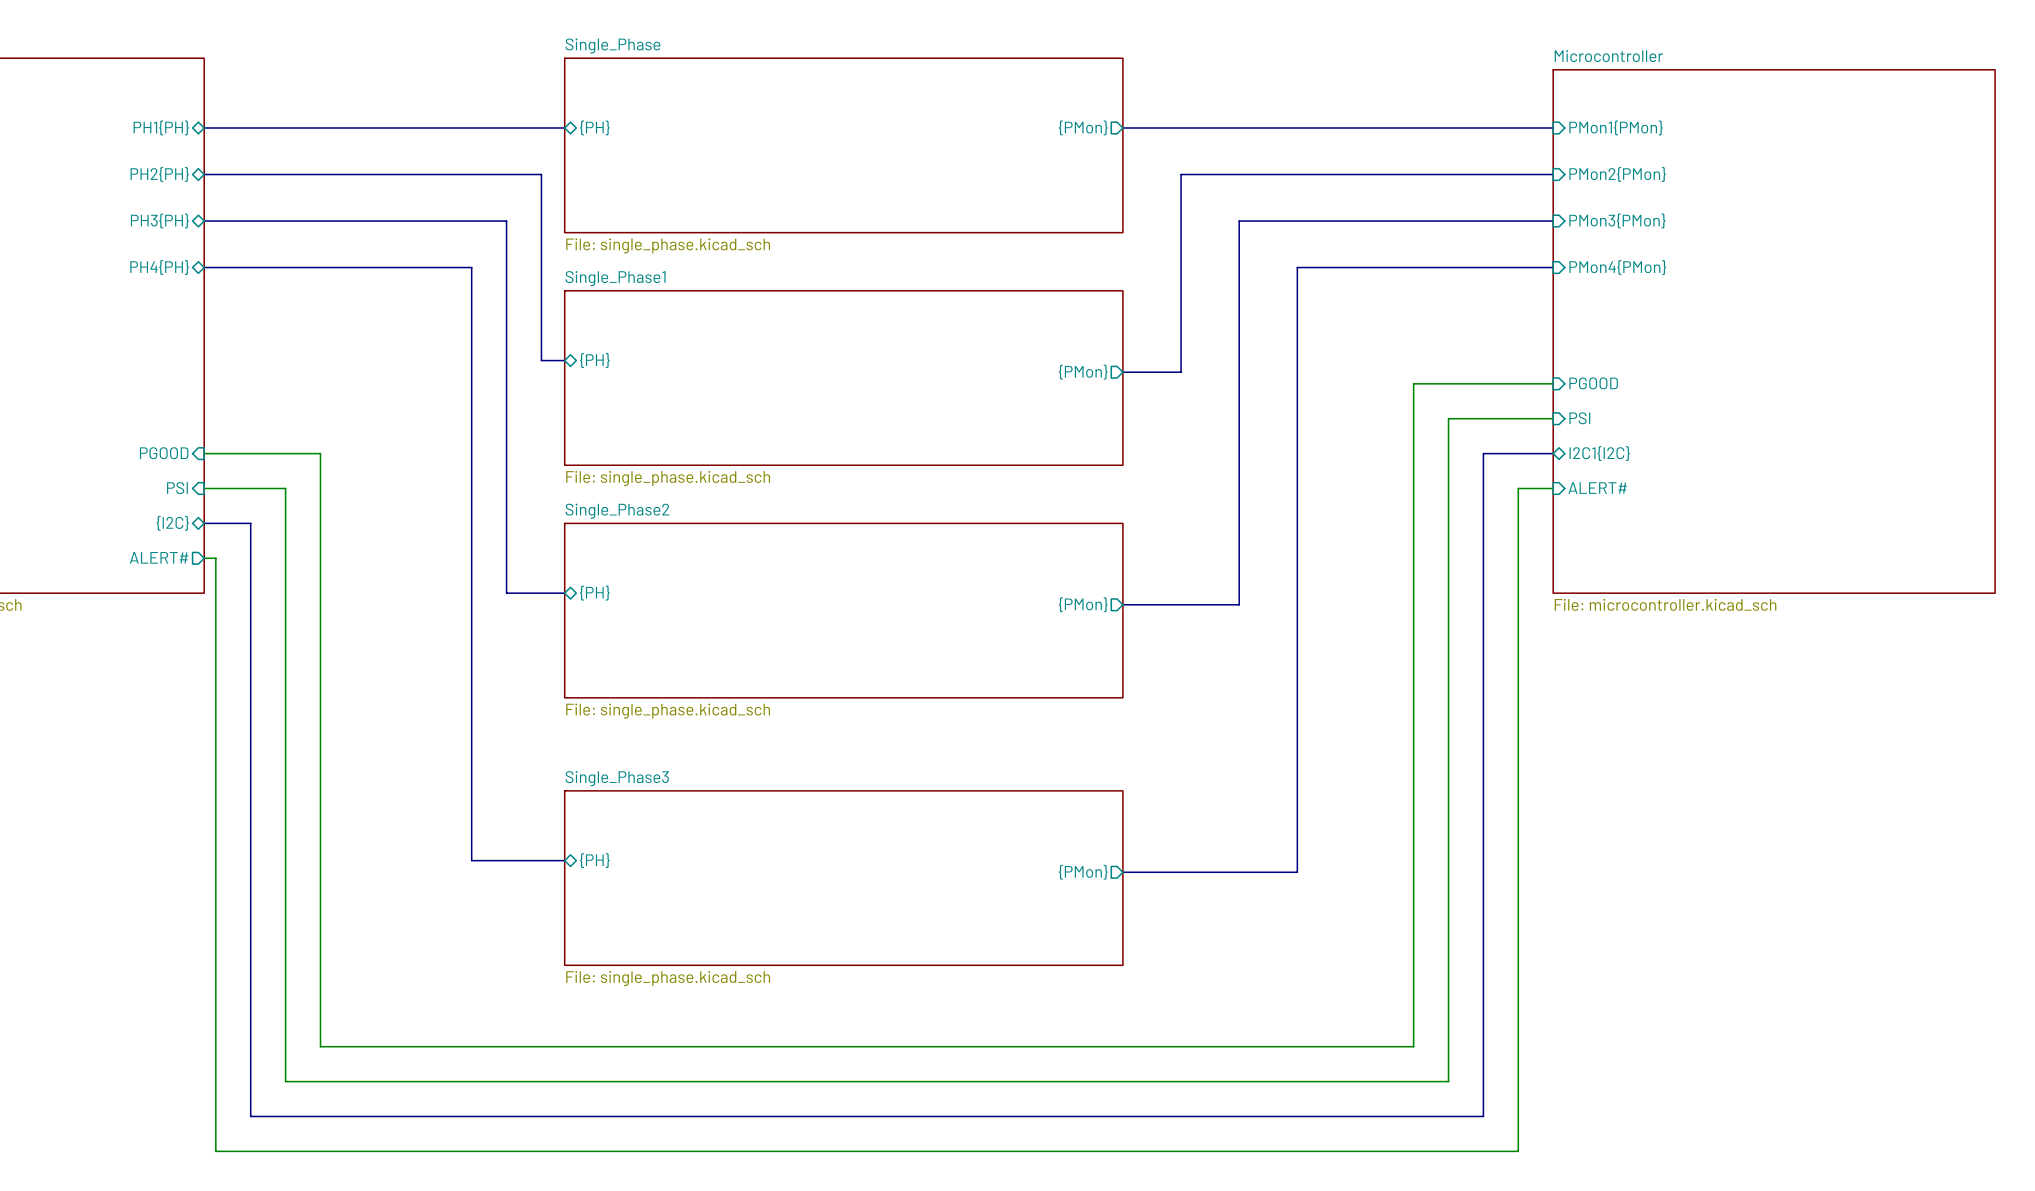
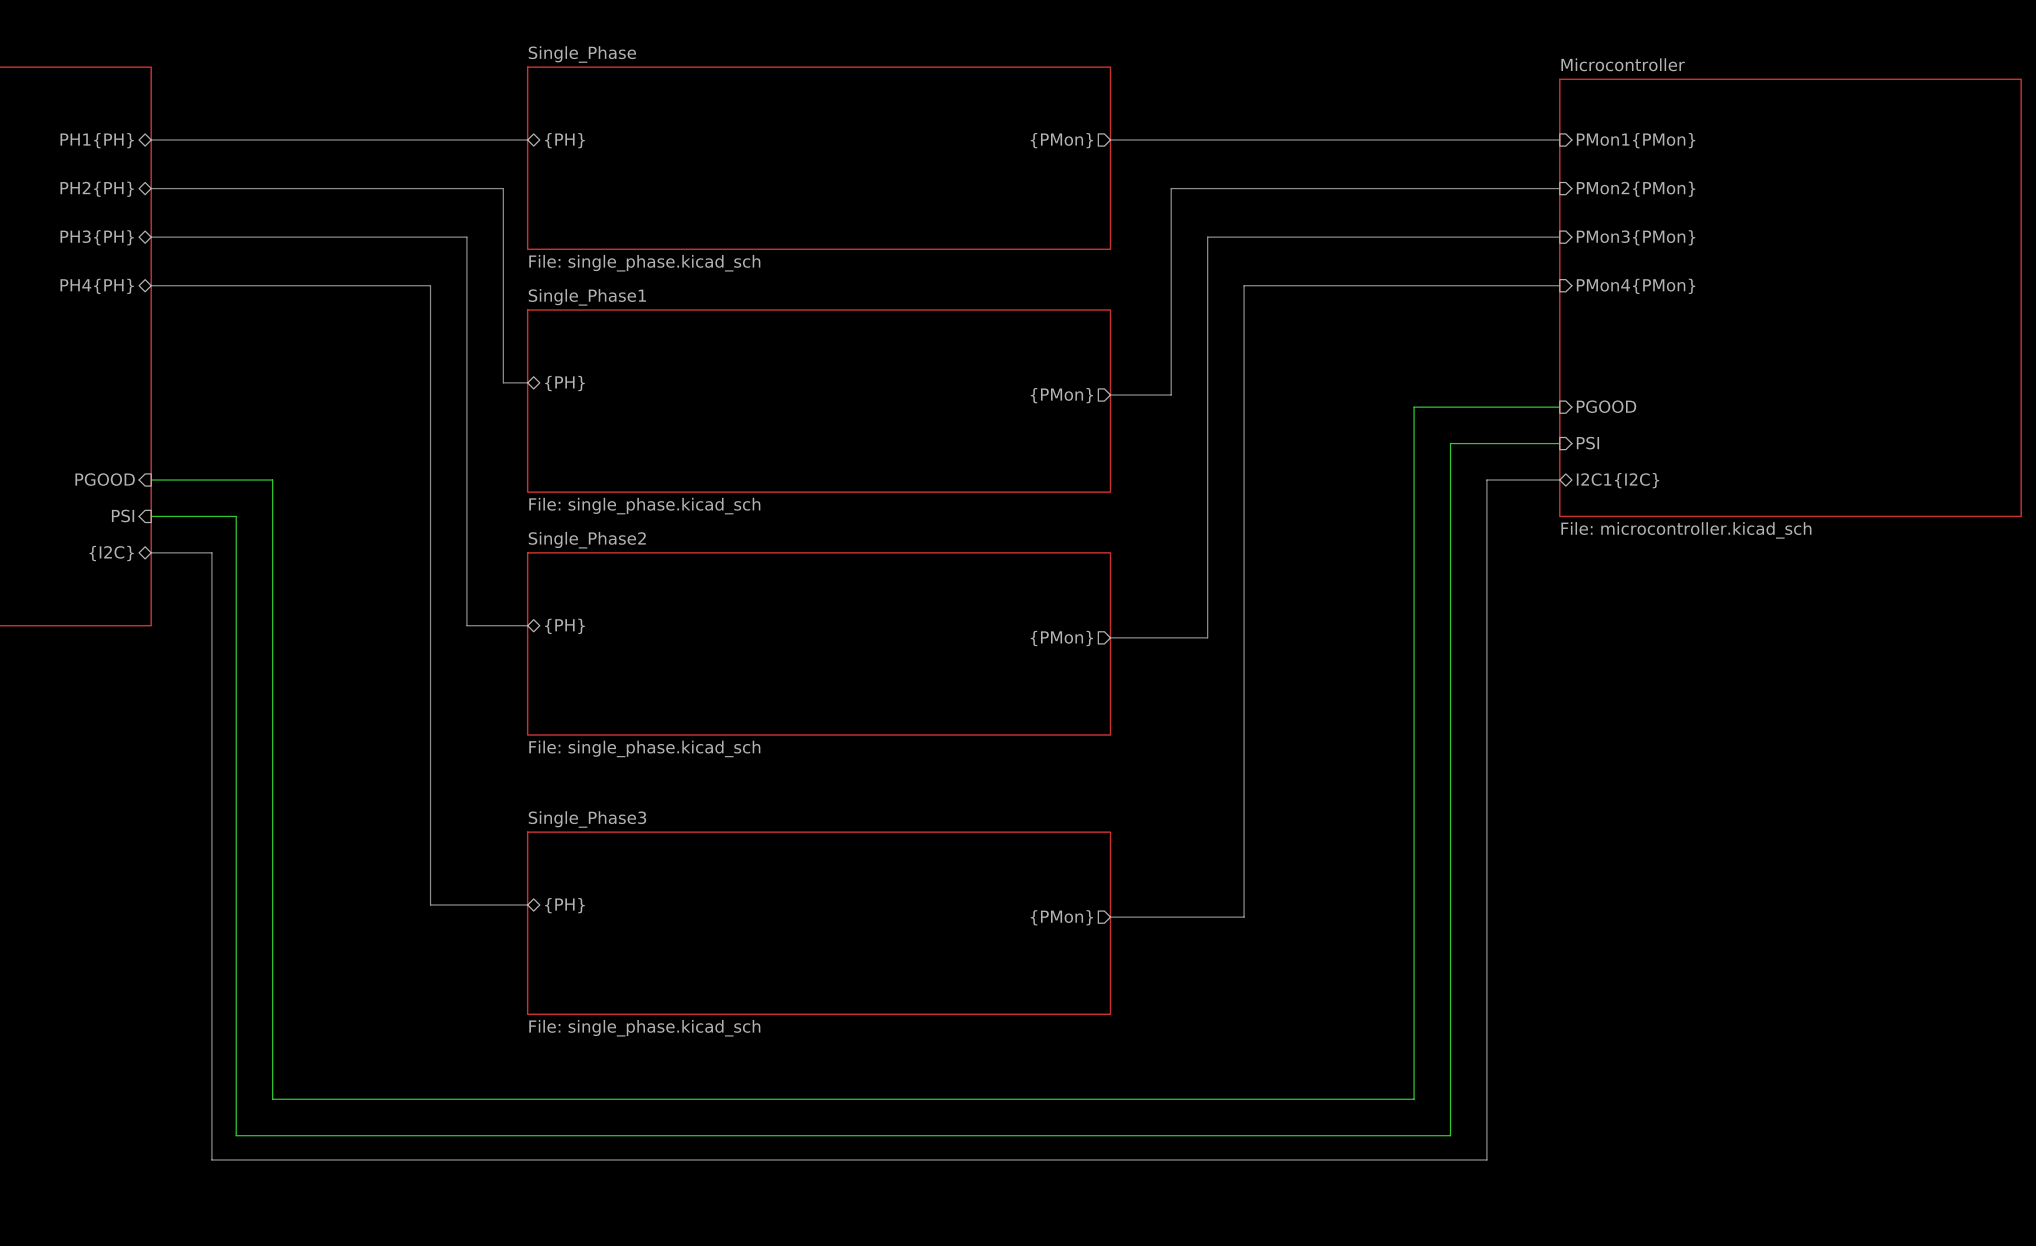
bus: (1239, 221) (1239, 604) (1215, 604) -> (1231, 237) (1207, 237) (1207, 637)
bus: (1297, 267) (1297, 872) (1250, 872) -> (1292, 285) (1244, 285) (1244, 917)
sheet Microcontroller: none -> File: microcontroller.kicad_sch (1790, 297)
sheet Microcontroller: File: microcontroller.kicad_sch (1774, 331) -> none
wire: (1553, 488) (1518, 488) (1518, 1151) (215, 1151) (215, 558) (204, 558) -> none
sheet pin: ALERT# (1597, 488) -> none
bus: (250, 523) (250, 1116) (1483, 1116) (1483, 1104) -> (199, 552) (211, 552) (211, 1159) (1486, 1159)
sheet pin: ALERT# (159, 557) -> none

